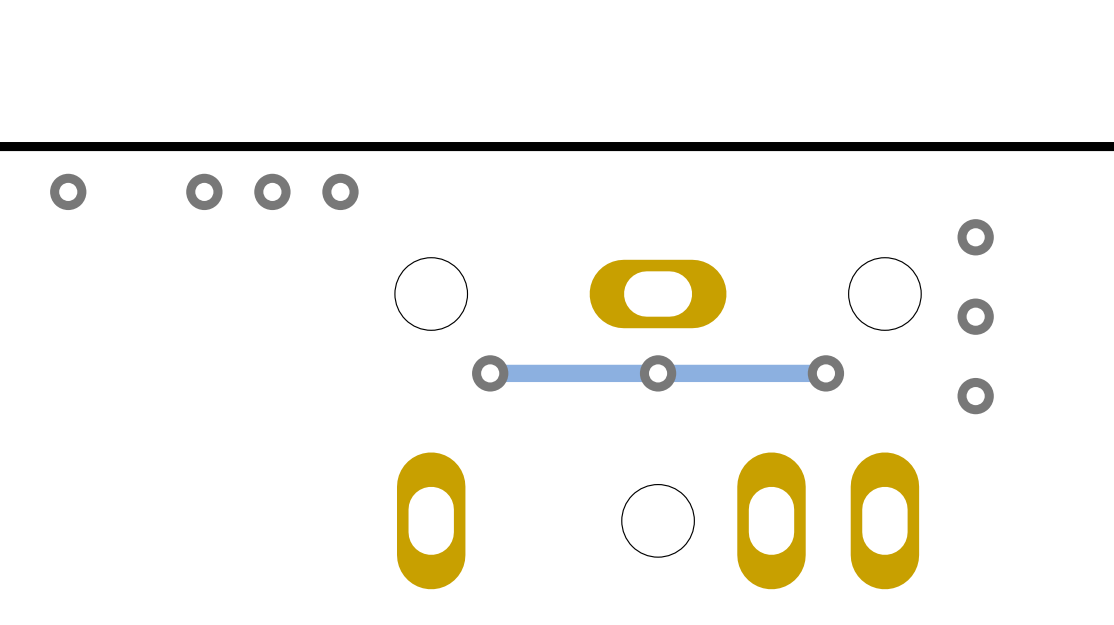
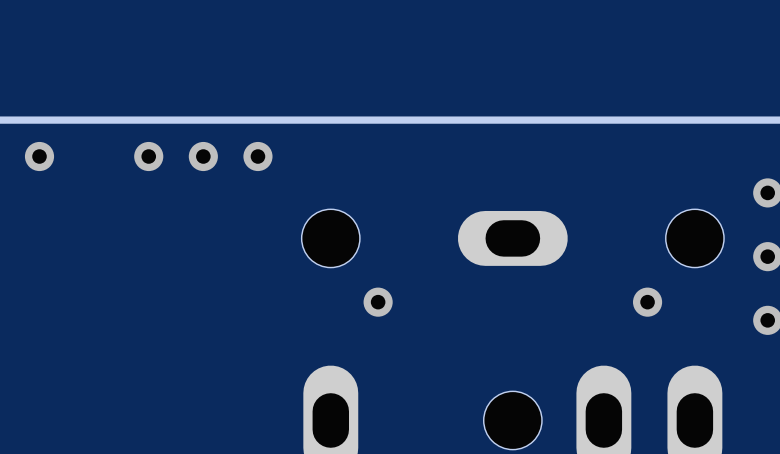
via: (658, 373) -> none
track: (825, 373) (490, 373) -> none

